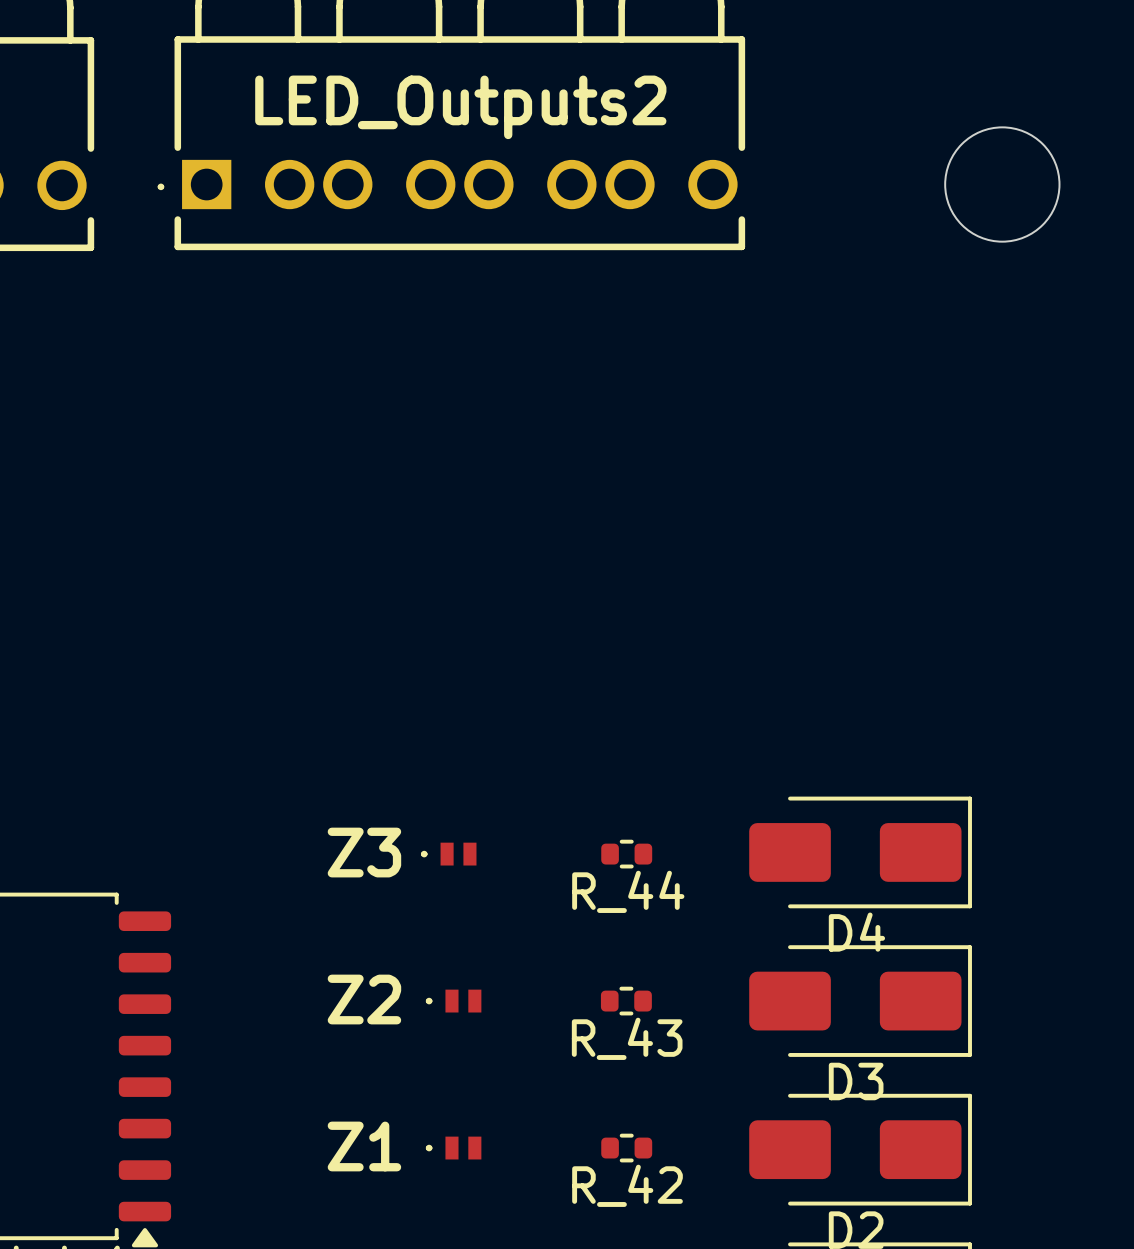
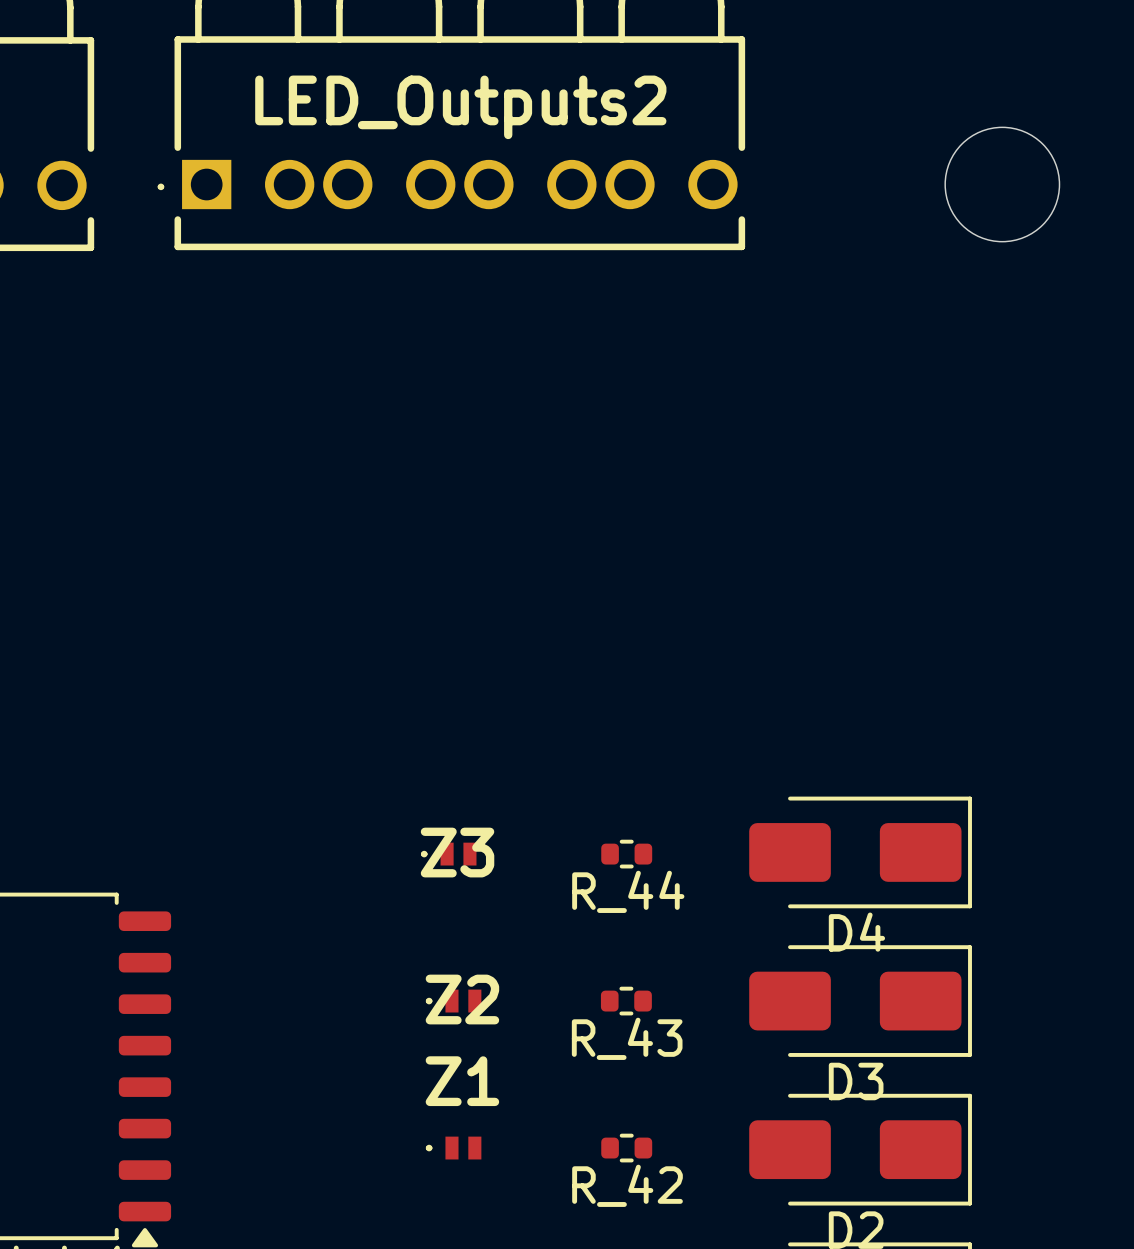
Z3 name position: Z3 (364, 852) -> Z3 (457, 852)
Z2 name position: Z2 (364, 999) -> Z2 (462, 999)
Z1 name position: Z1 (364, 1146) -> Z1 (462, 1081)

